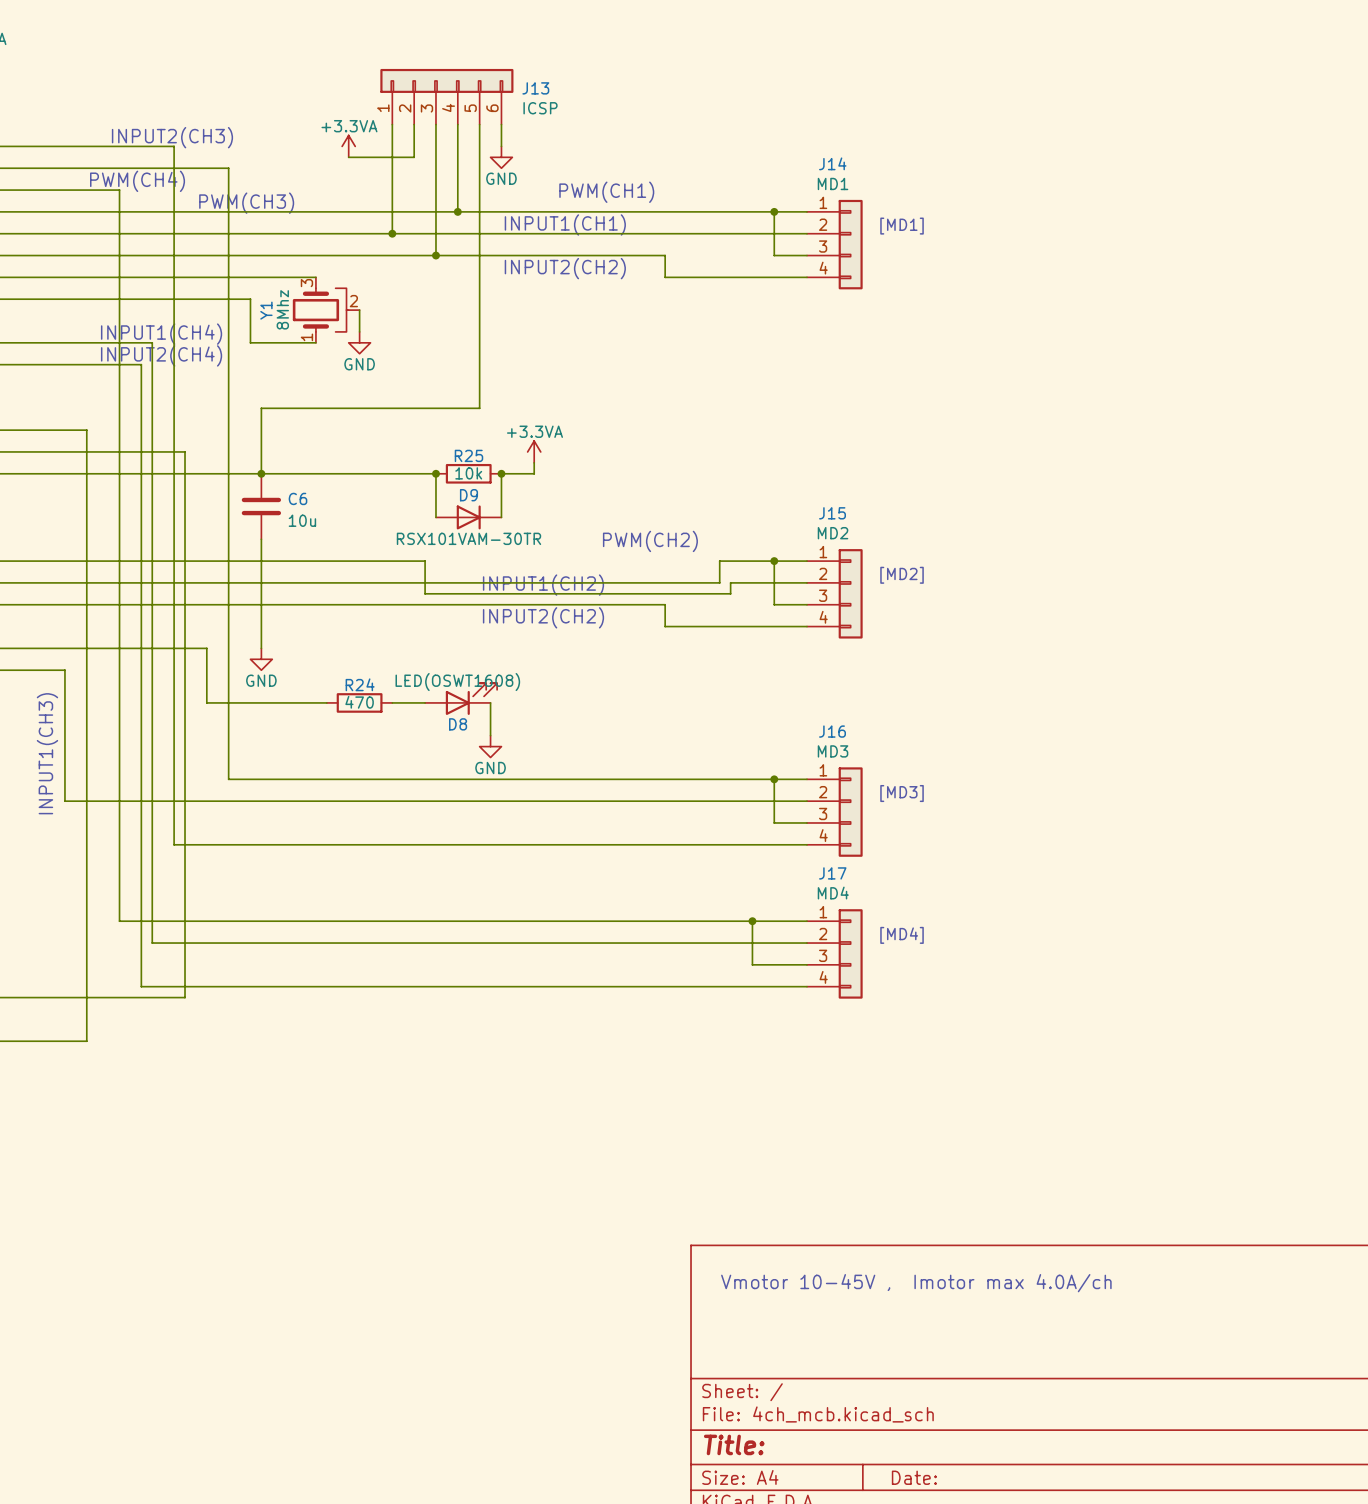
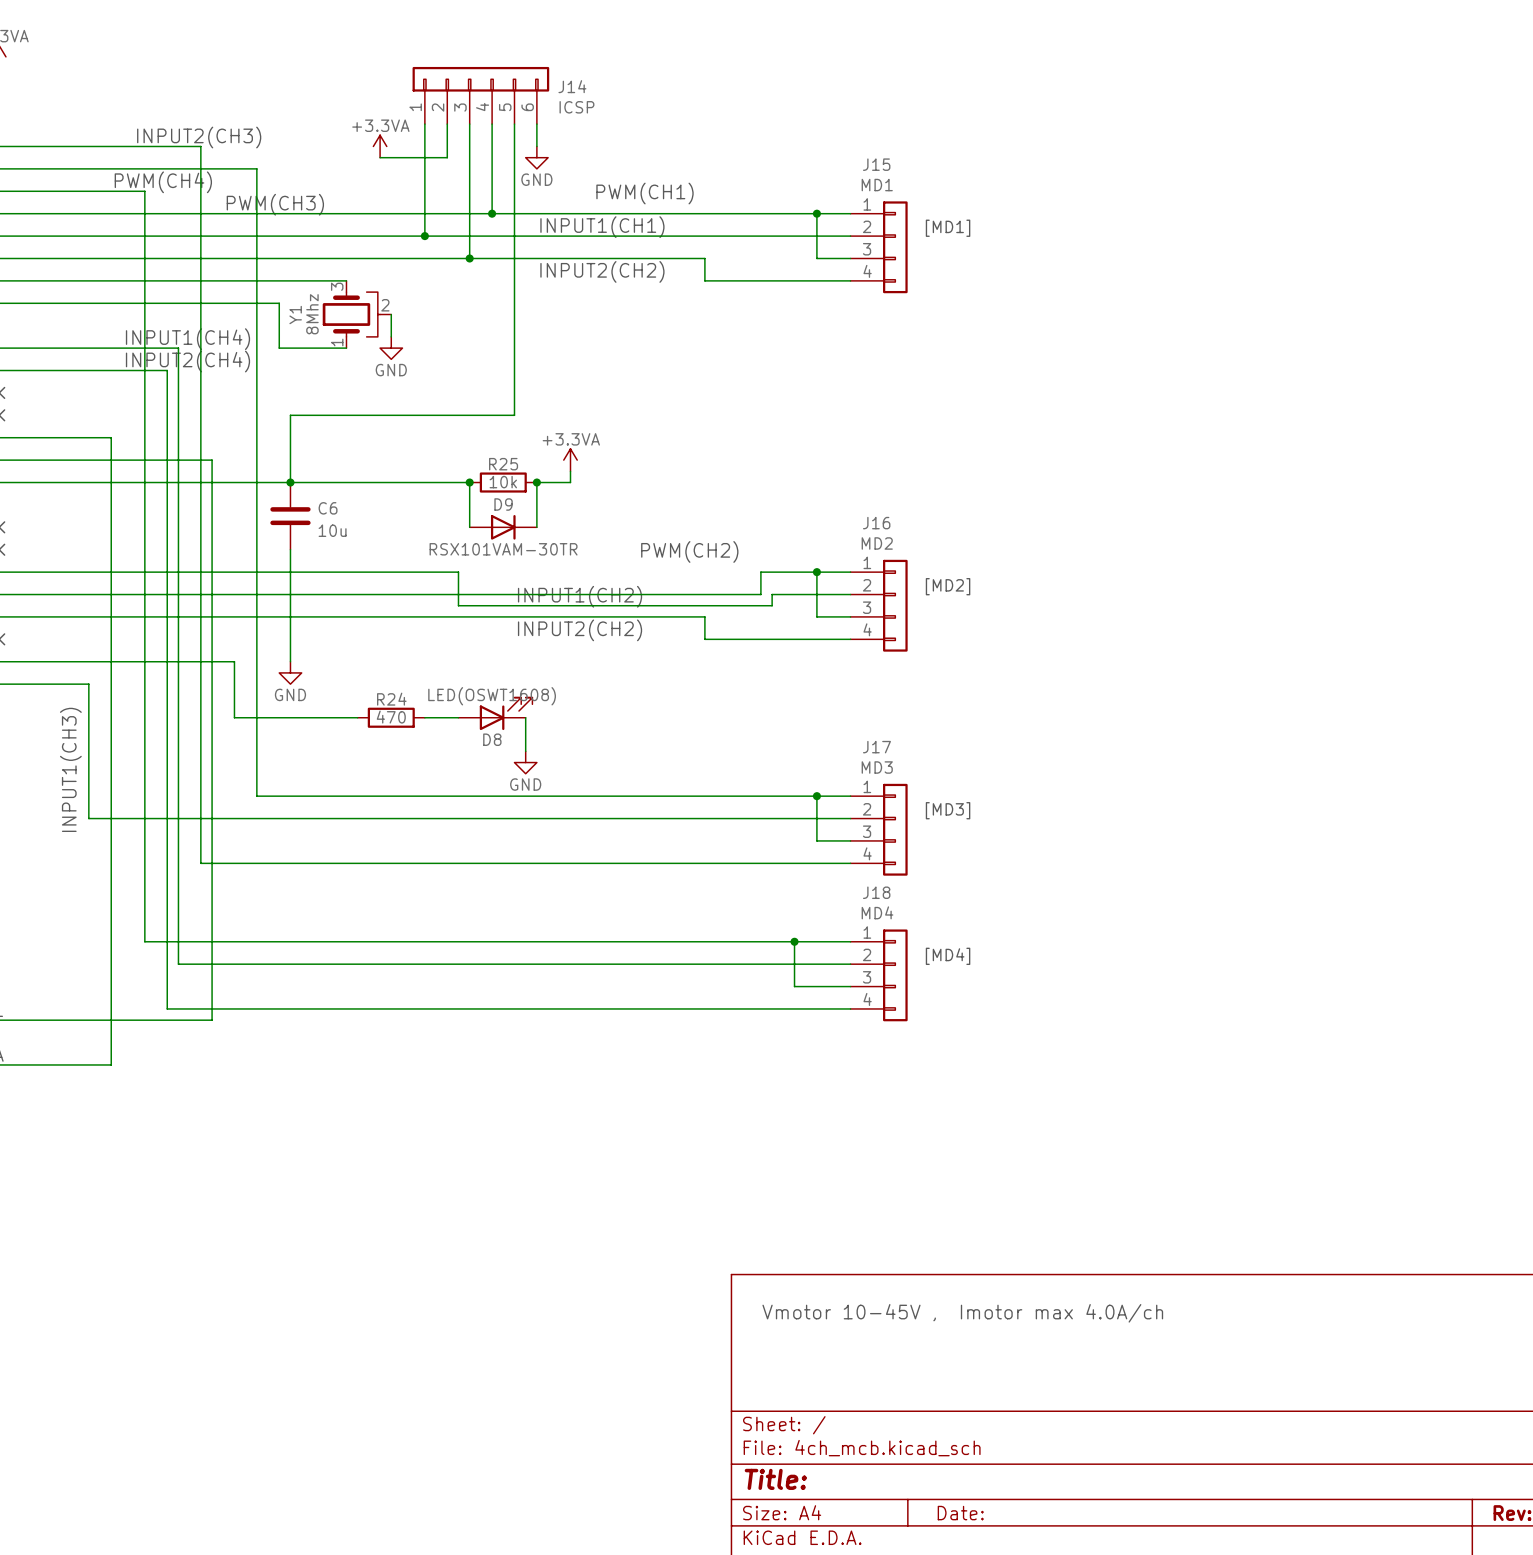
J13 name: J13 (535, 88) -> J14 (572, 86)
J14 name: J14 (832, 163) -> J15 (876, 164)
J15 name: J15 (832, 513) -> J16 (876, 523)
J16 name: J16 (832, 731) -> J17 (876, 747)
J17 name: J17 (832, 873) -> J18 (876, 892)

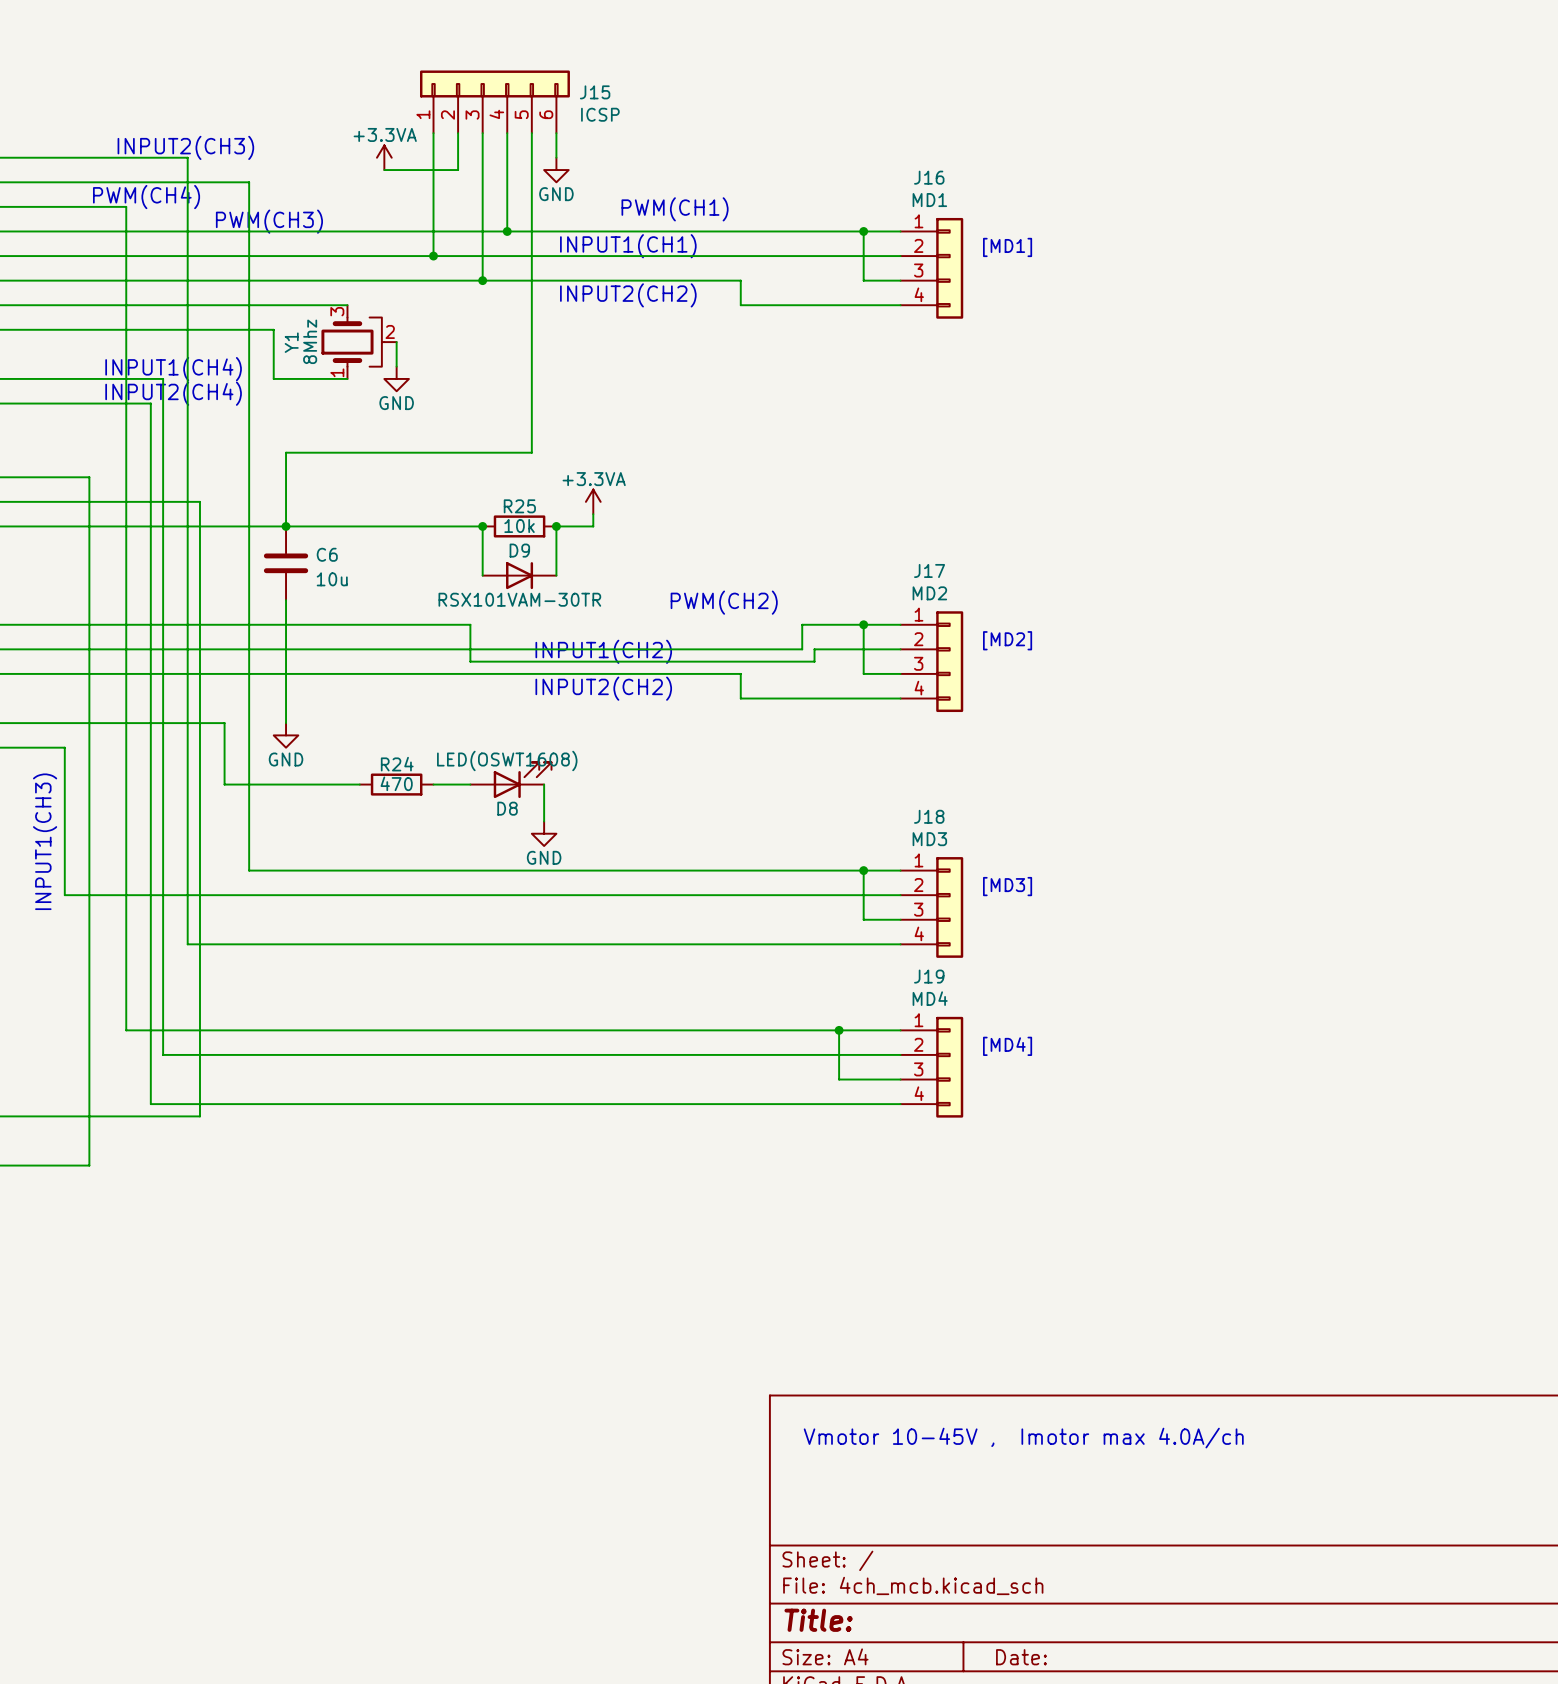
J14 name: J14 (572, 86) -> J15 (595, 92)
J15 name: J15 (876, 164) -> J16 (929, 177)
J16 name: J16 (876, 523) -> J17 (929, 570)
J17 name: J17 (876, 747) -> J18 (929, 816)
J18 name: J18 (876, 892) -> J19 (929, 976)

